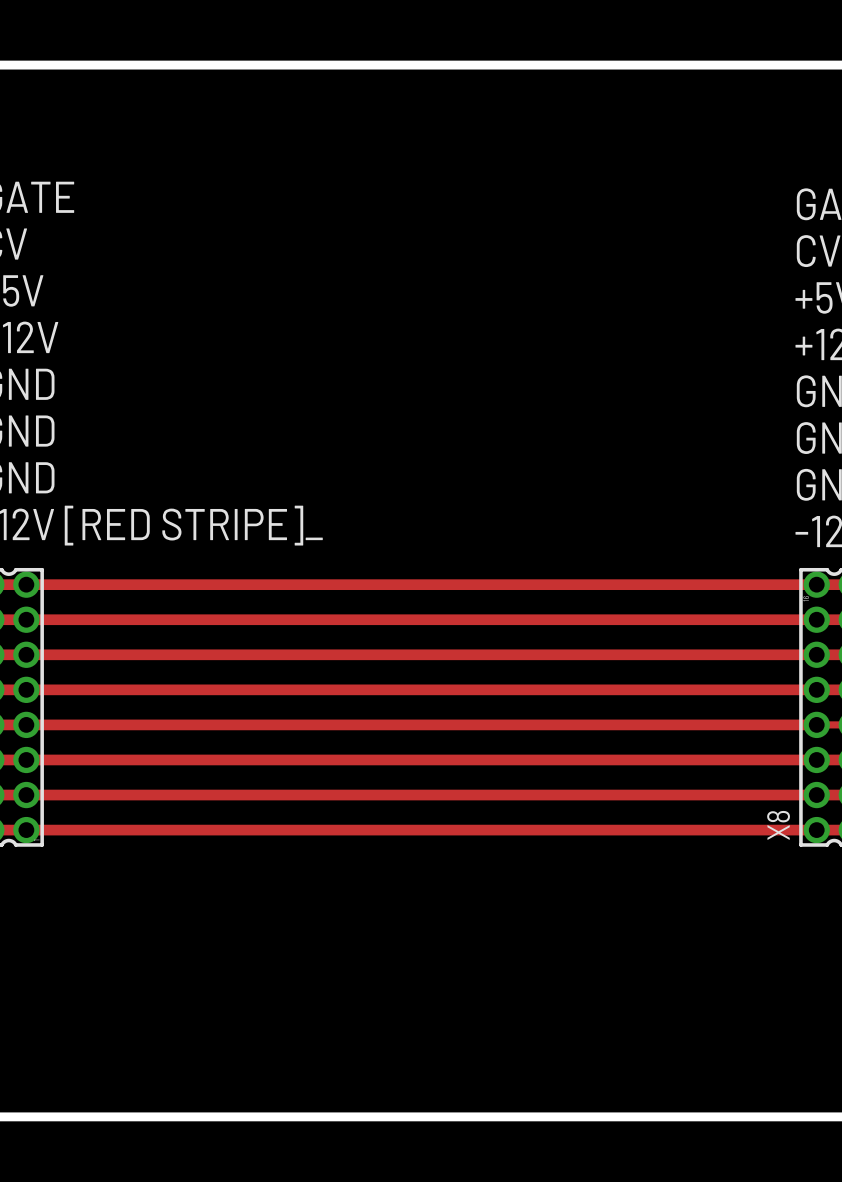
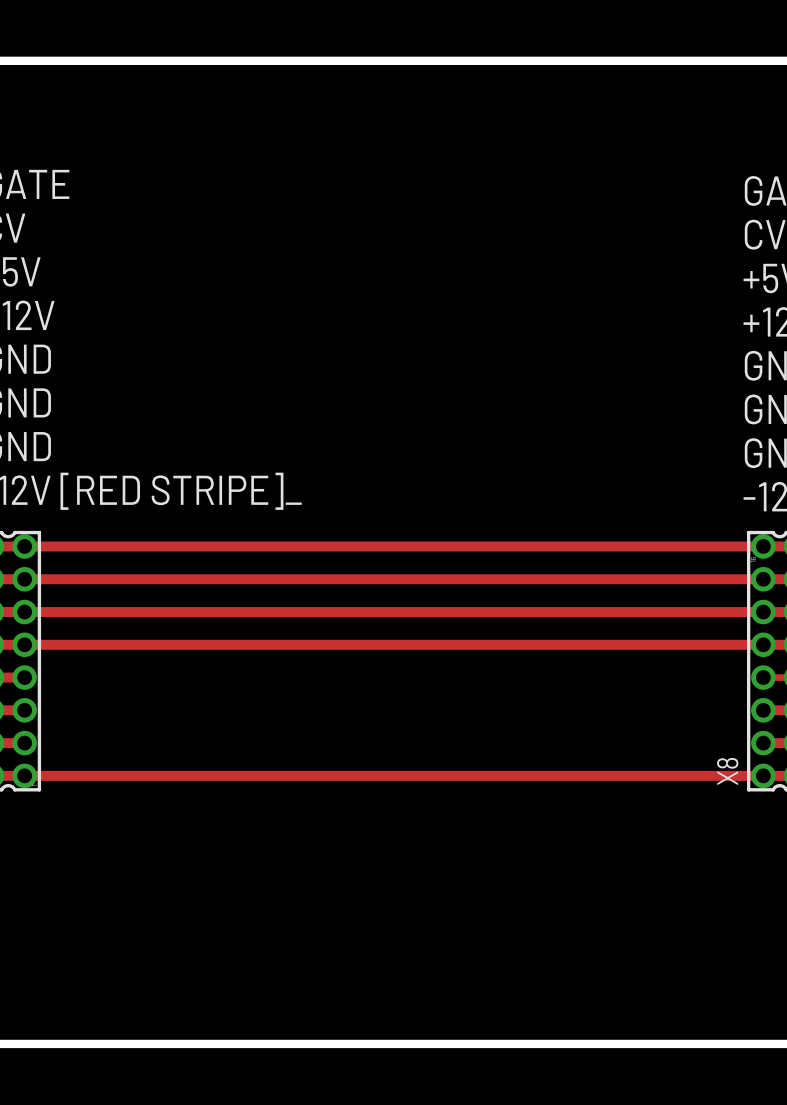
track: (26, 724) (816, 724) -> none
track: (26, 759) (816, 759) -> none
track: (26, 795) (816, 795) -> none

